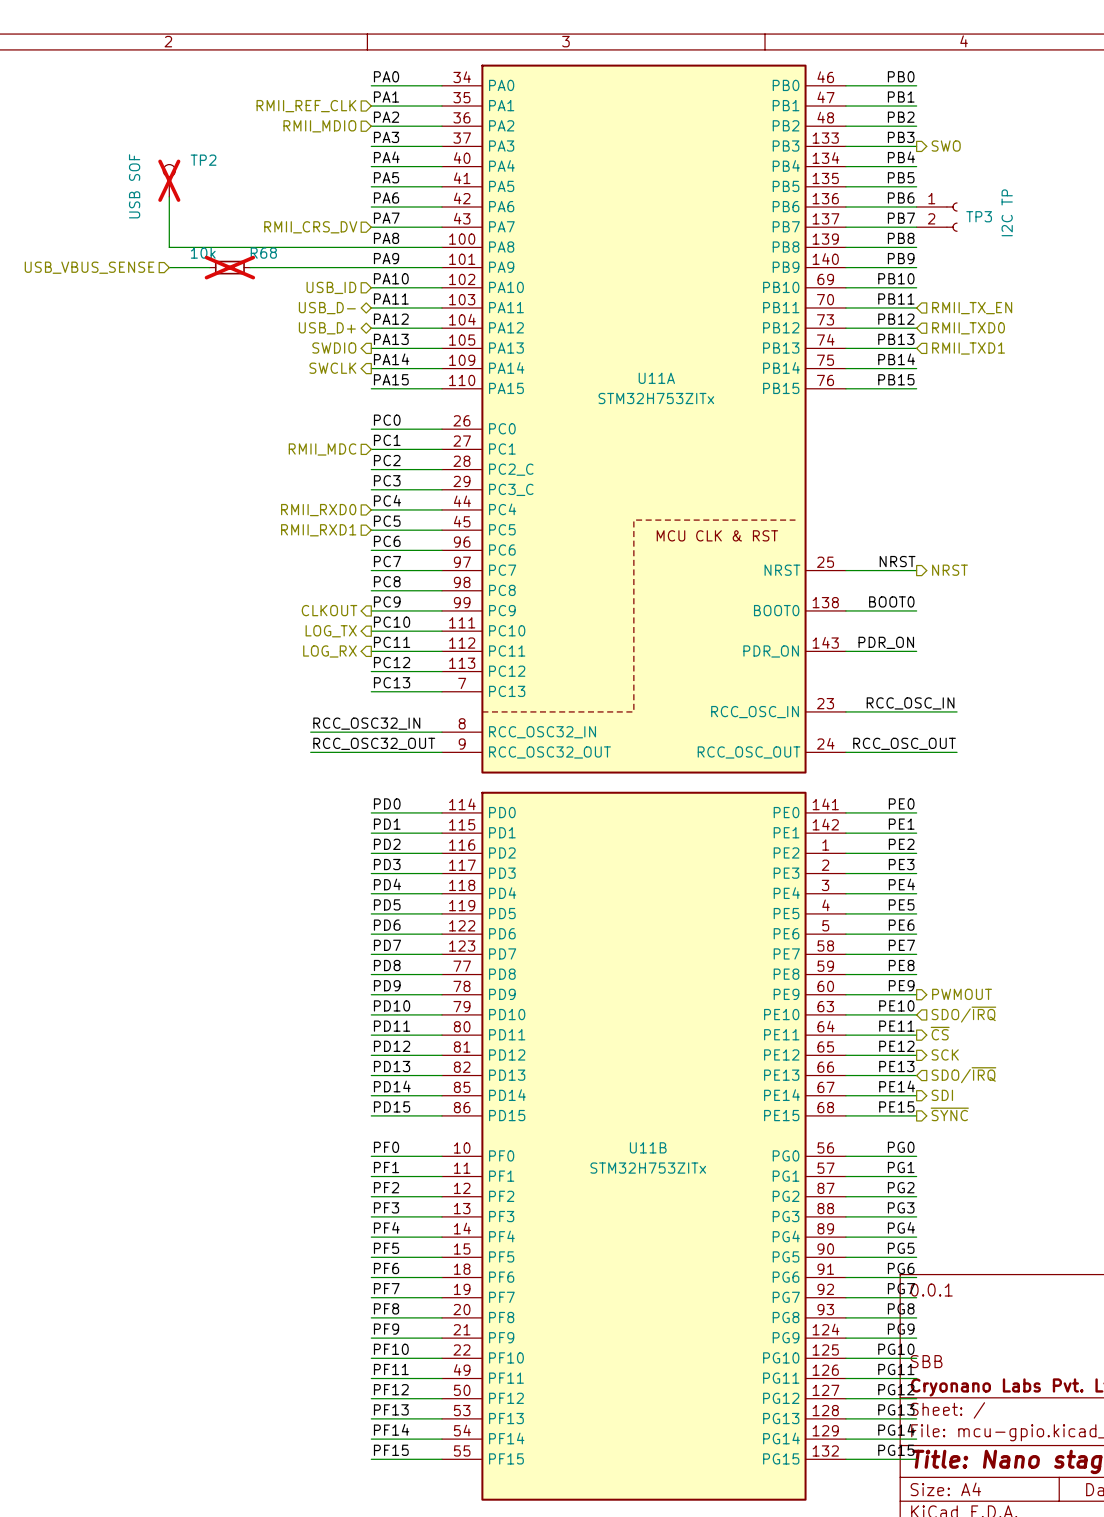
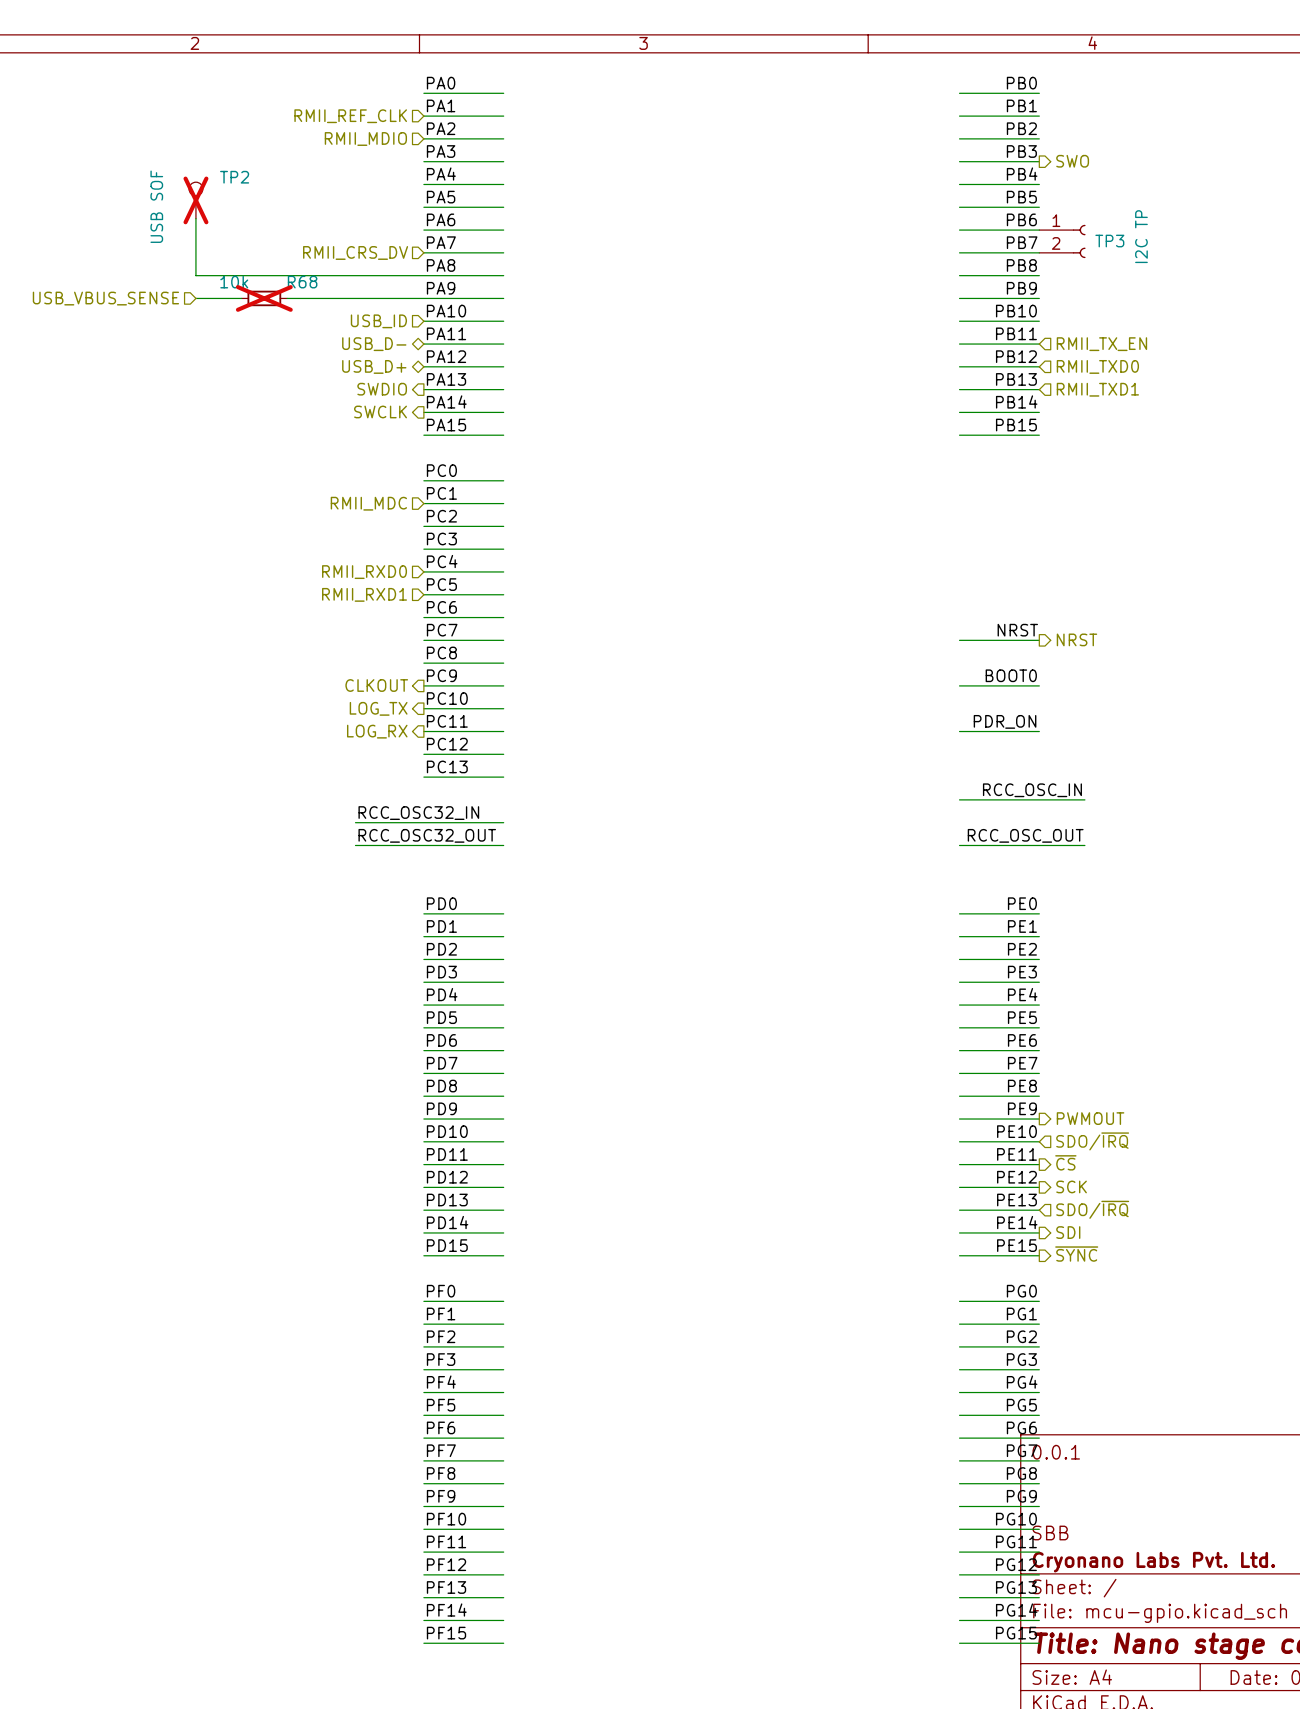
U11A: STM32H753ZITx (643, 419) -> none
U11B: STM32H753ZITx (643, 1146) -> none

